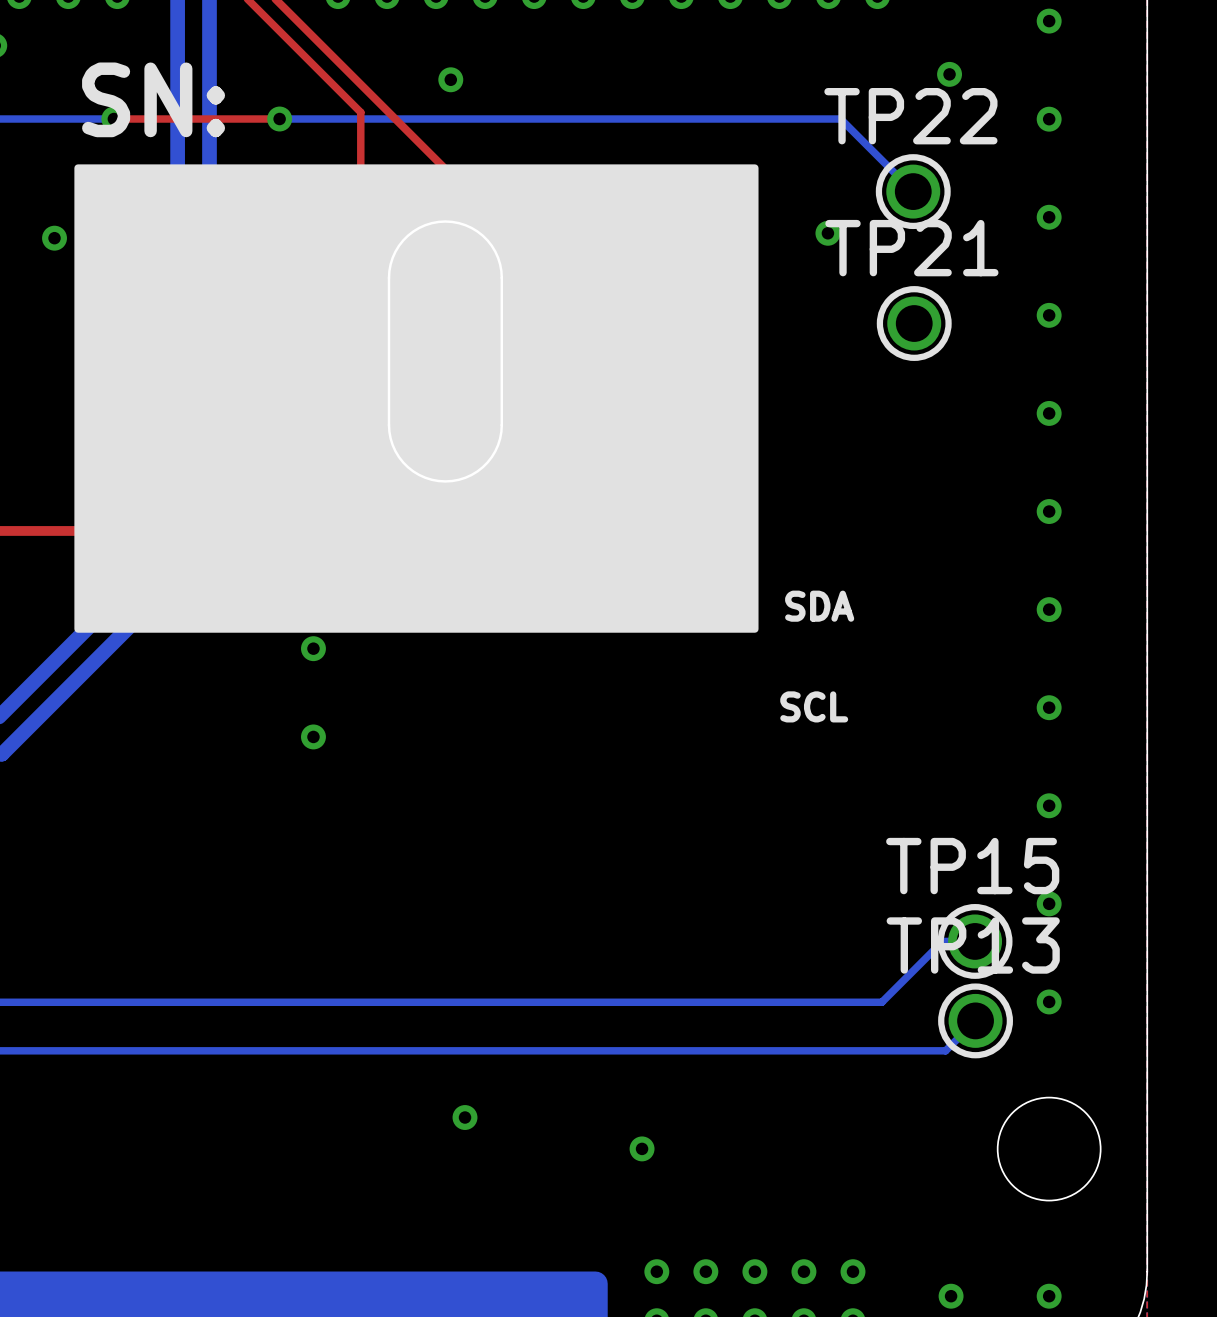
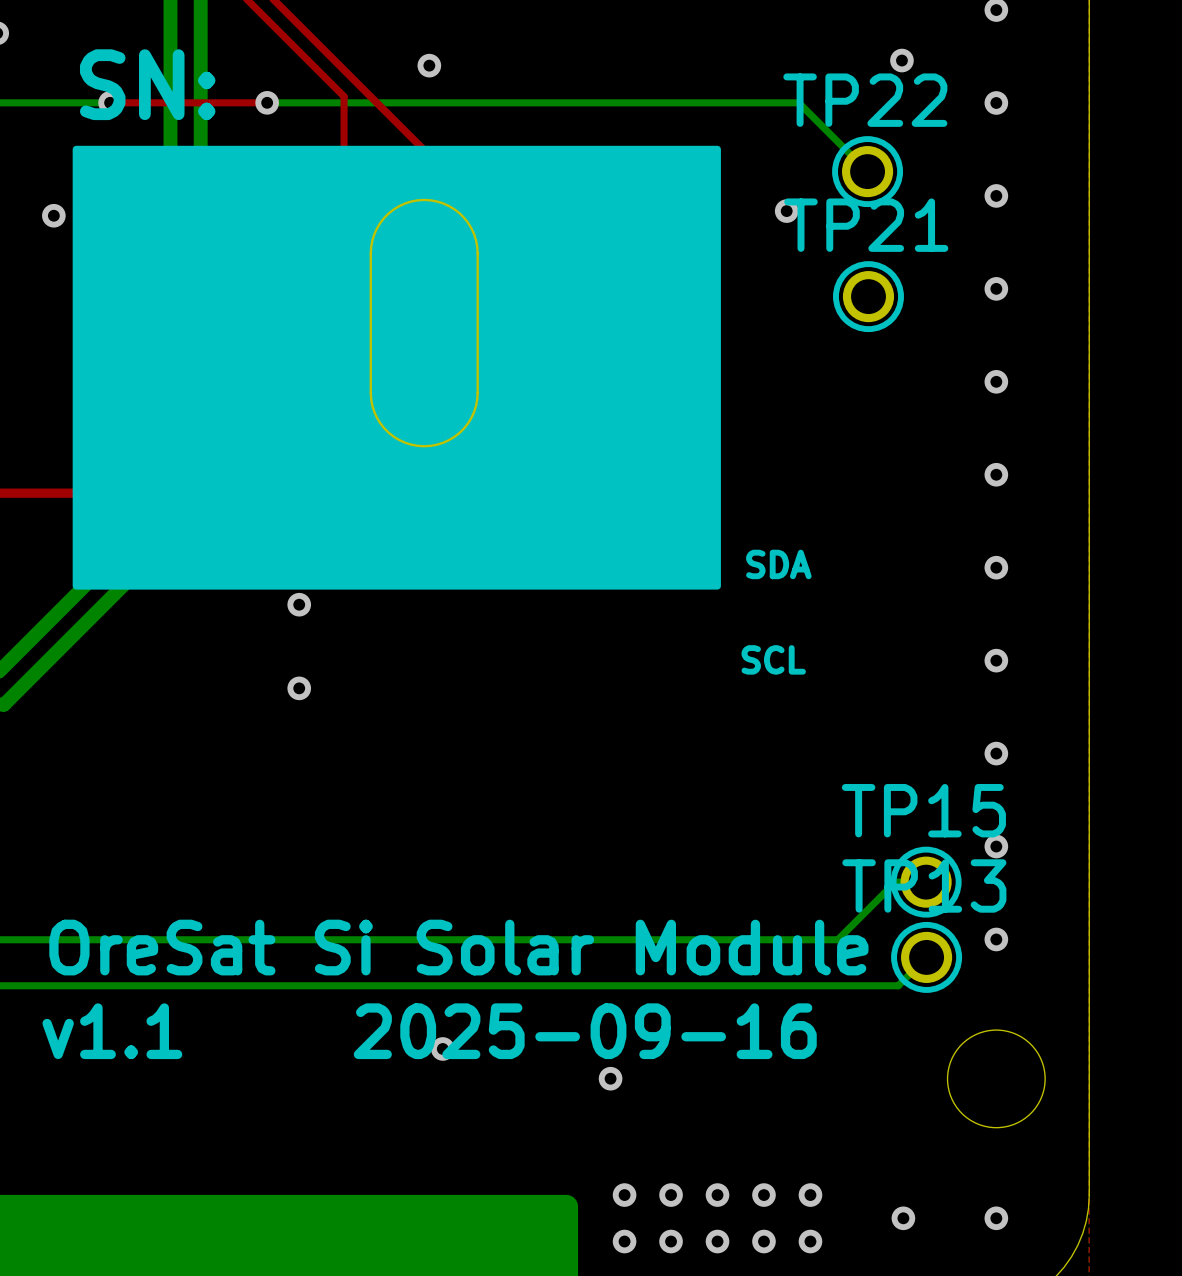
text: none -> OreSat Si Solar Module (458, 947)
text: none -> v1.1 (112, 1031)
text: none -> 2025-09-16 (585, 1031)

